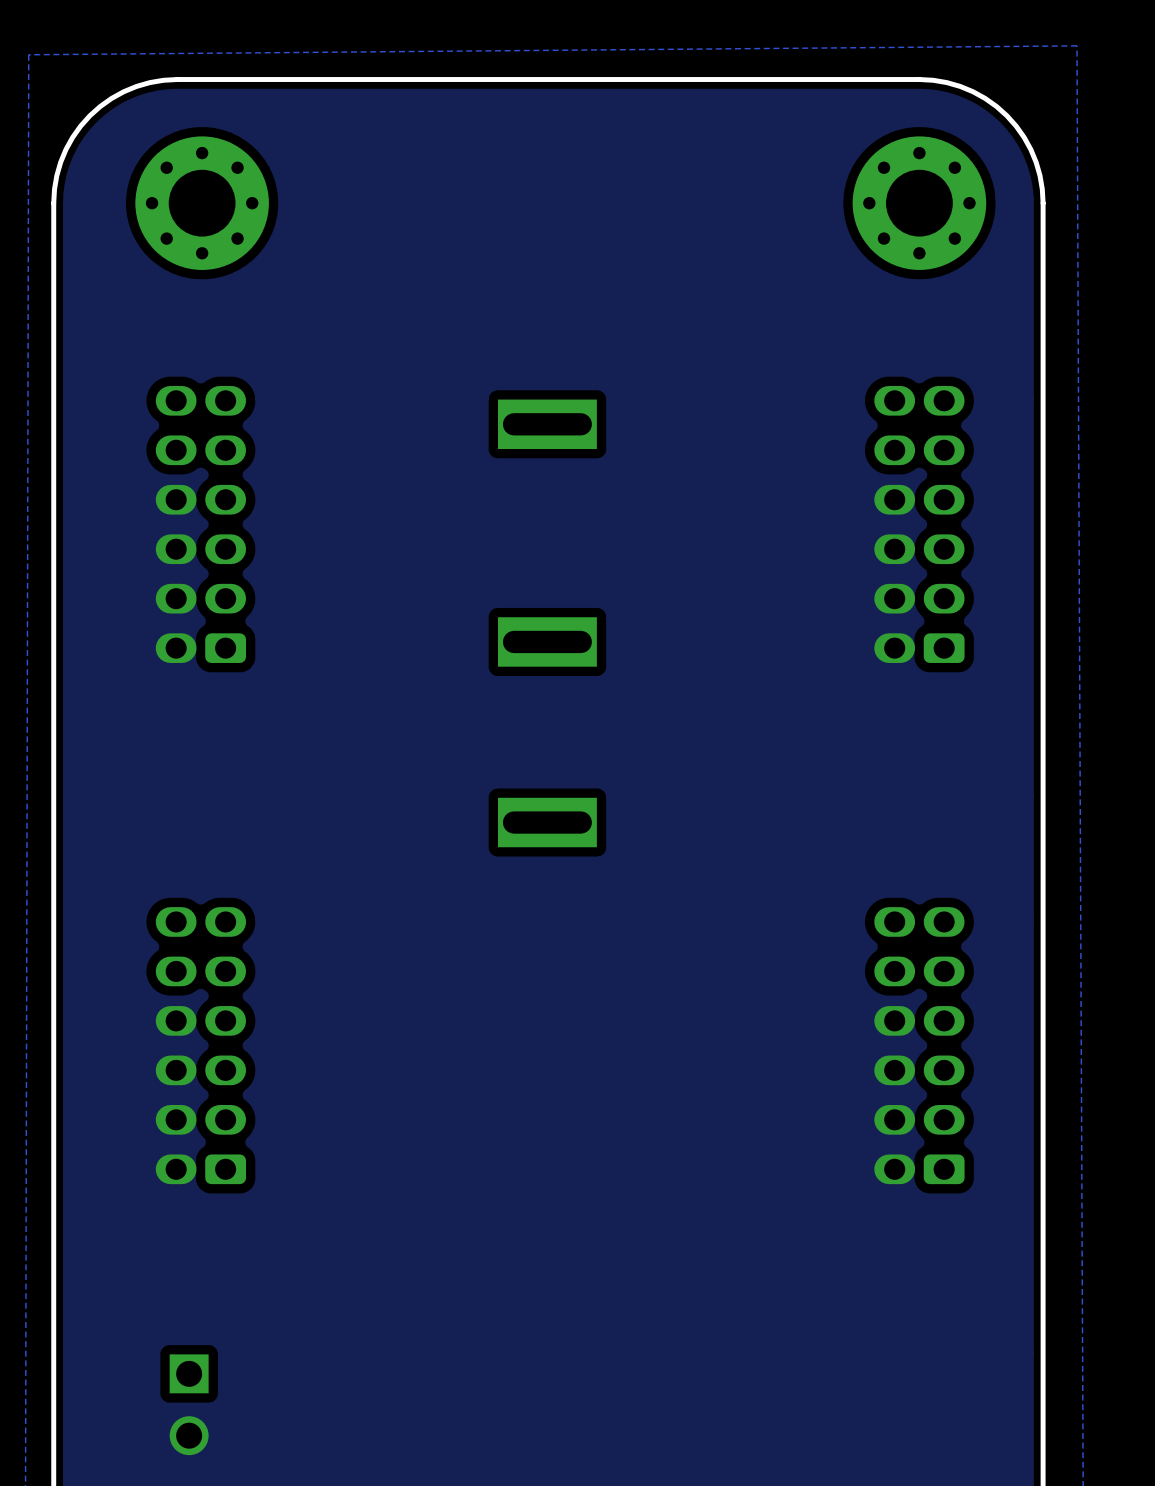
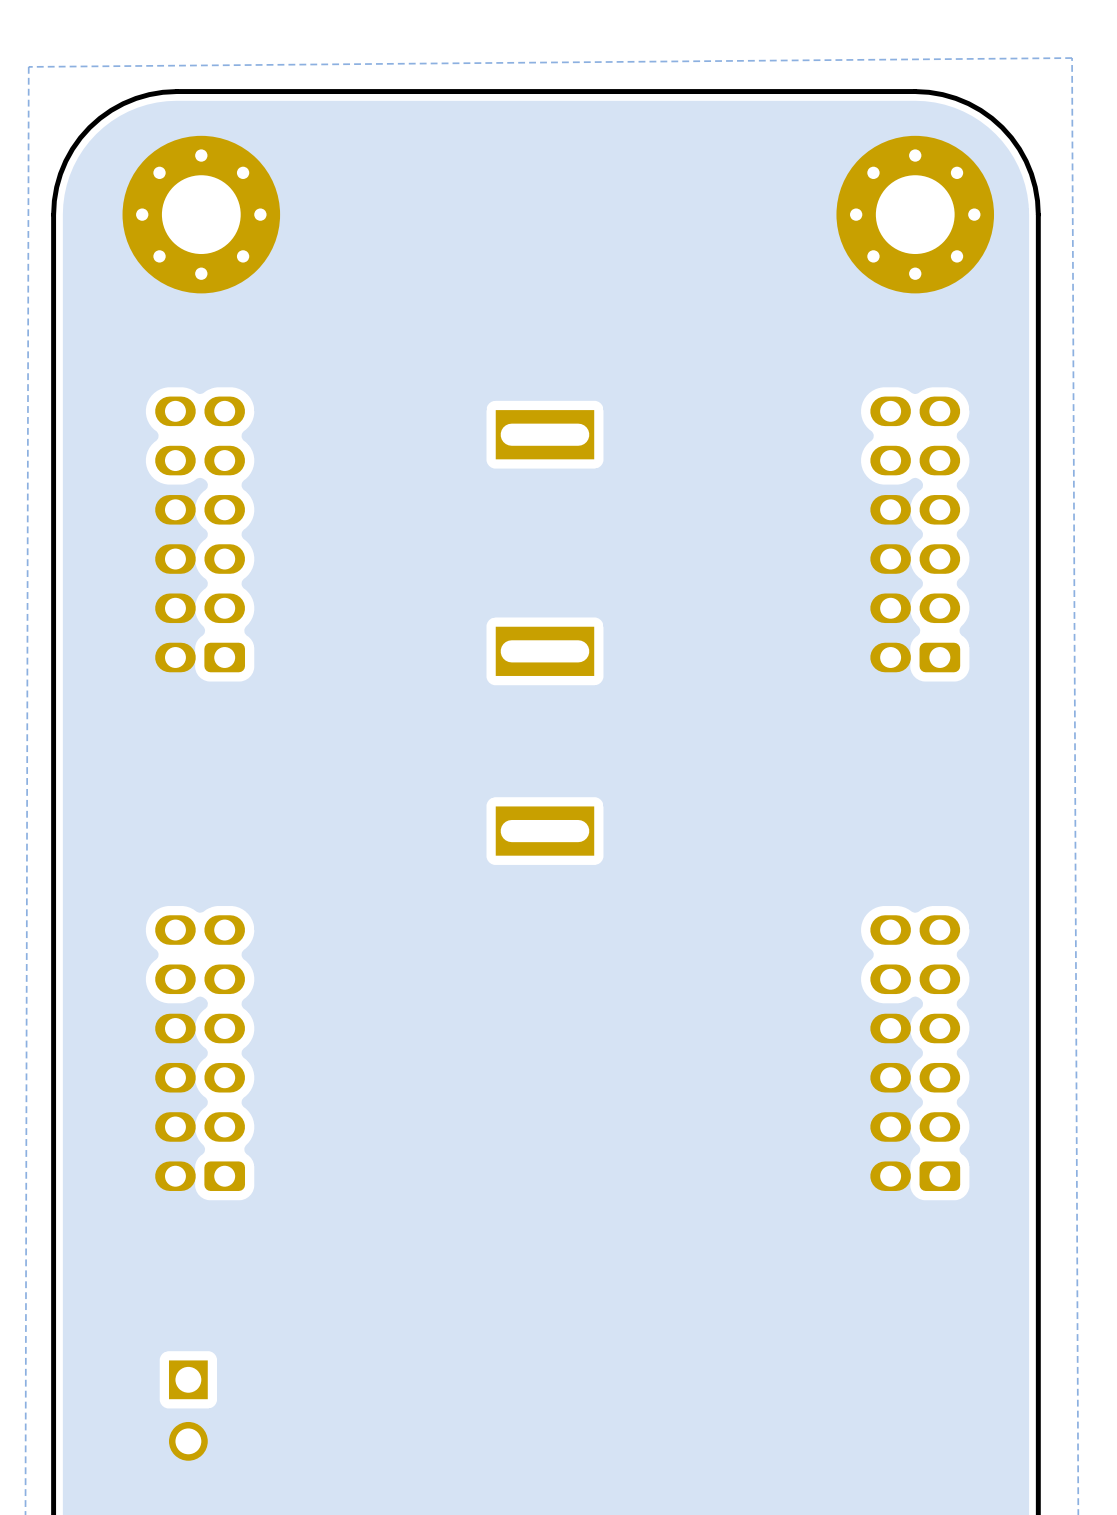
part footprint: [135, 136, 269, 270] -> [122, 135, 281, 294]
part footprint: [852, 136, 987, 270] -> [836, 135, 995, 294]

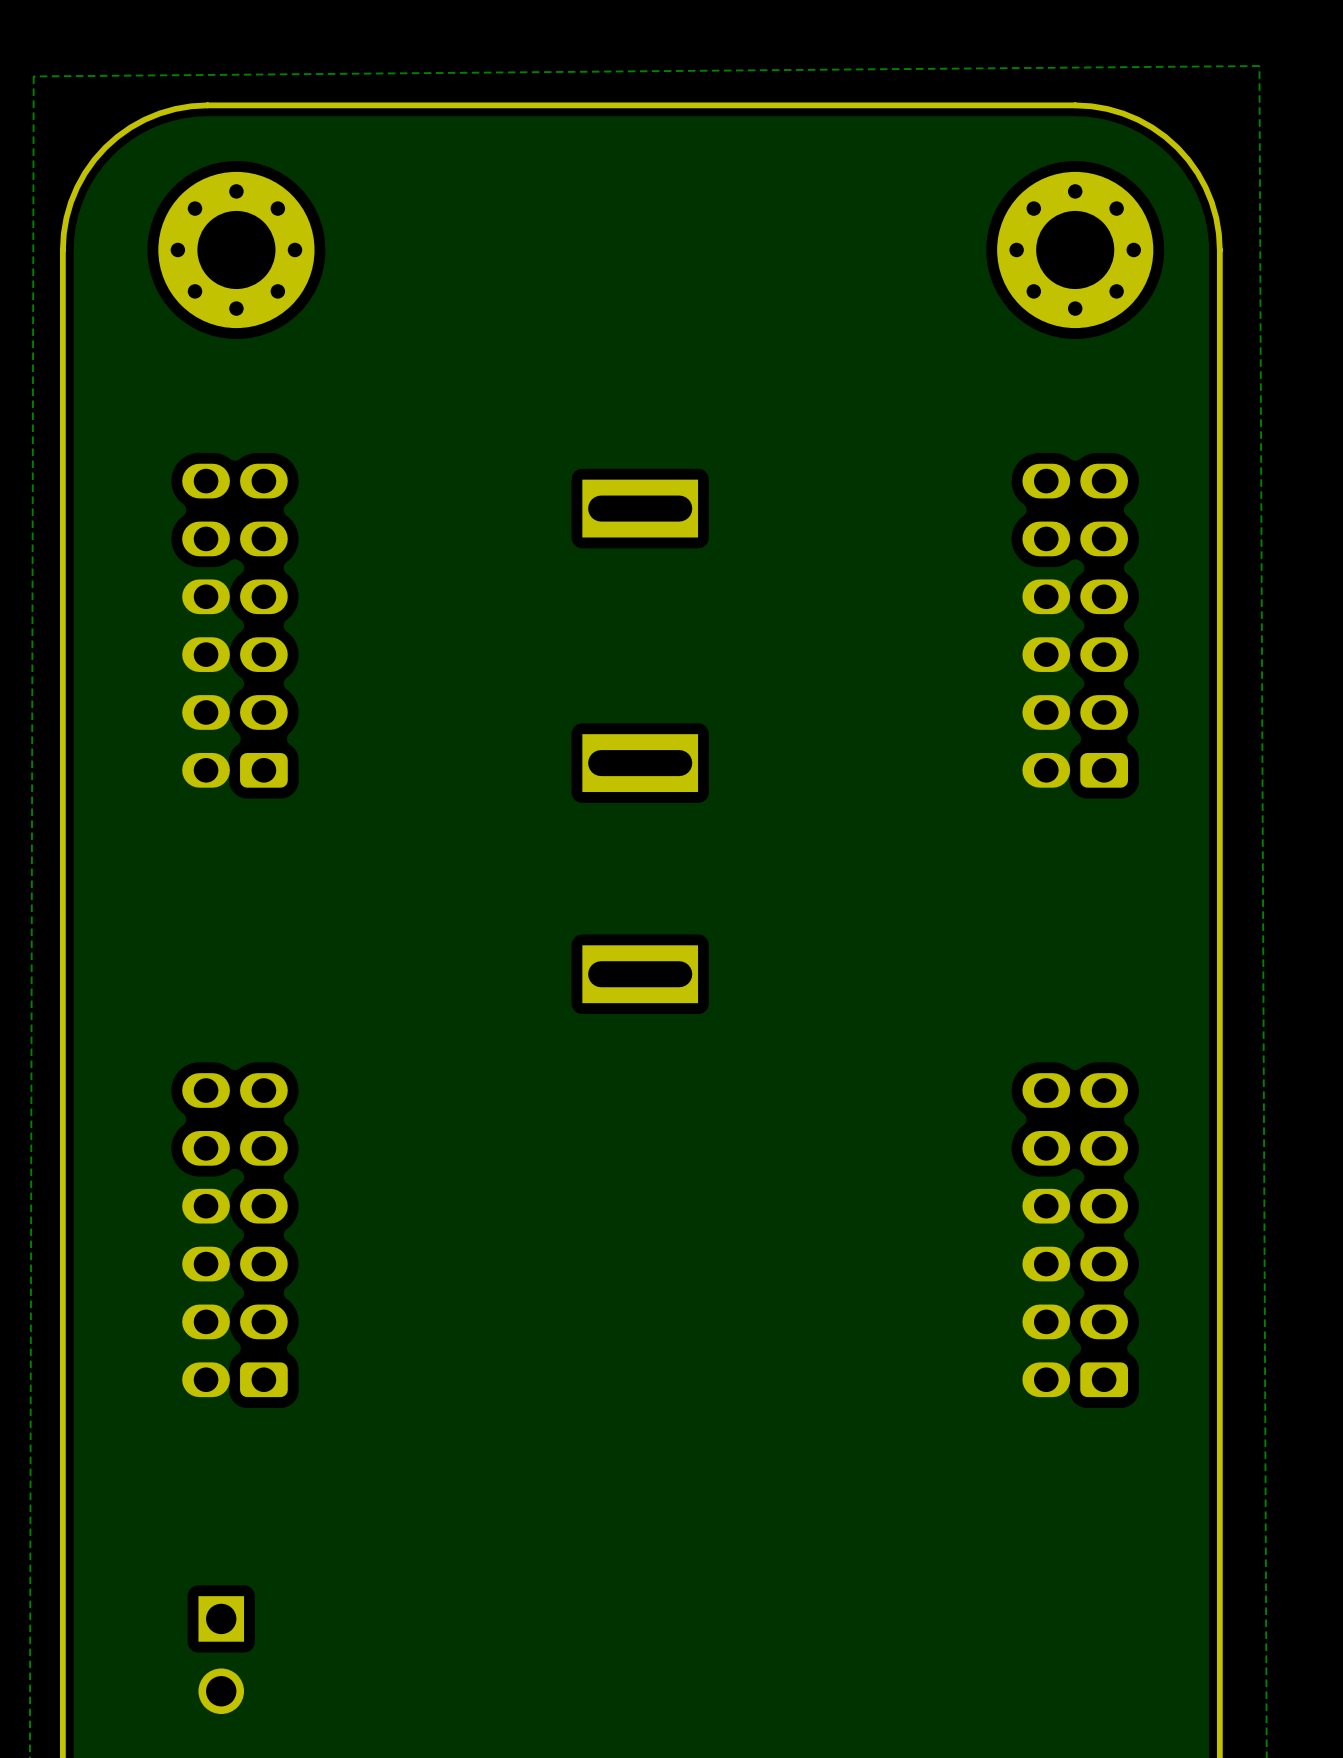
part footprint: [122, 135, 281, 294] -> [158, 171, 315, 329]
part footprint: [836, 135, 995, 294] -> [997, 171, 1154, 329]

